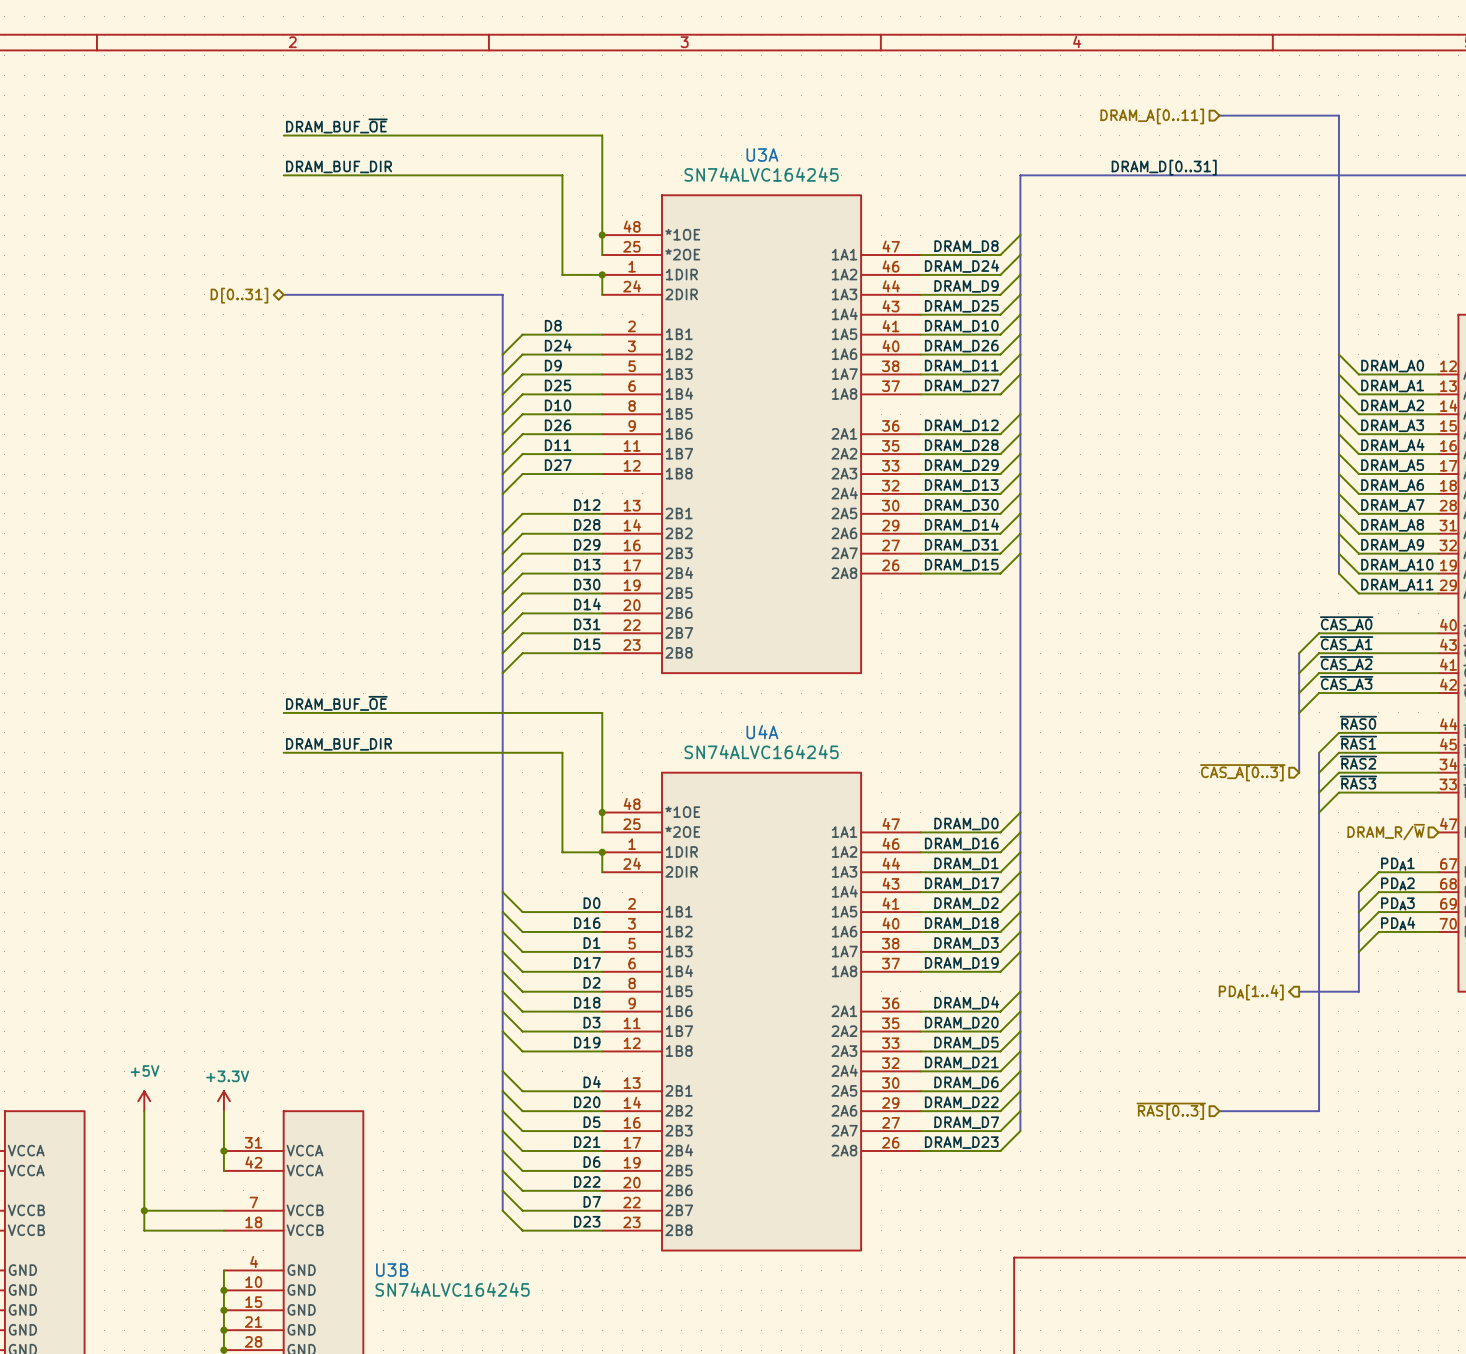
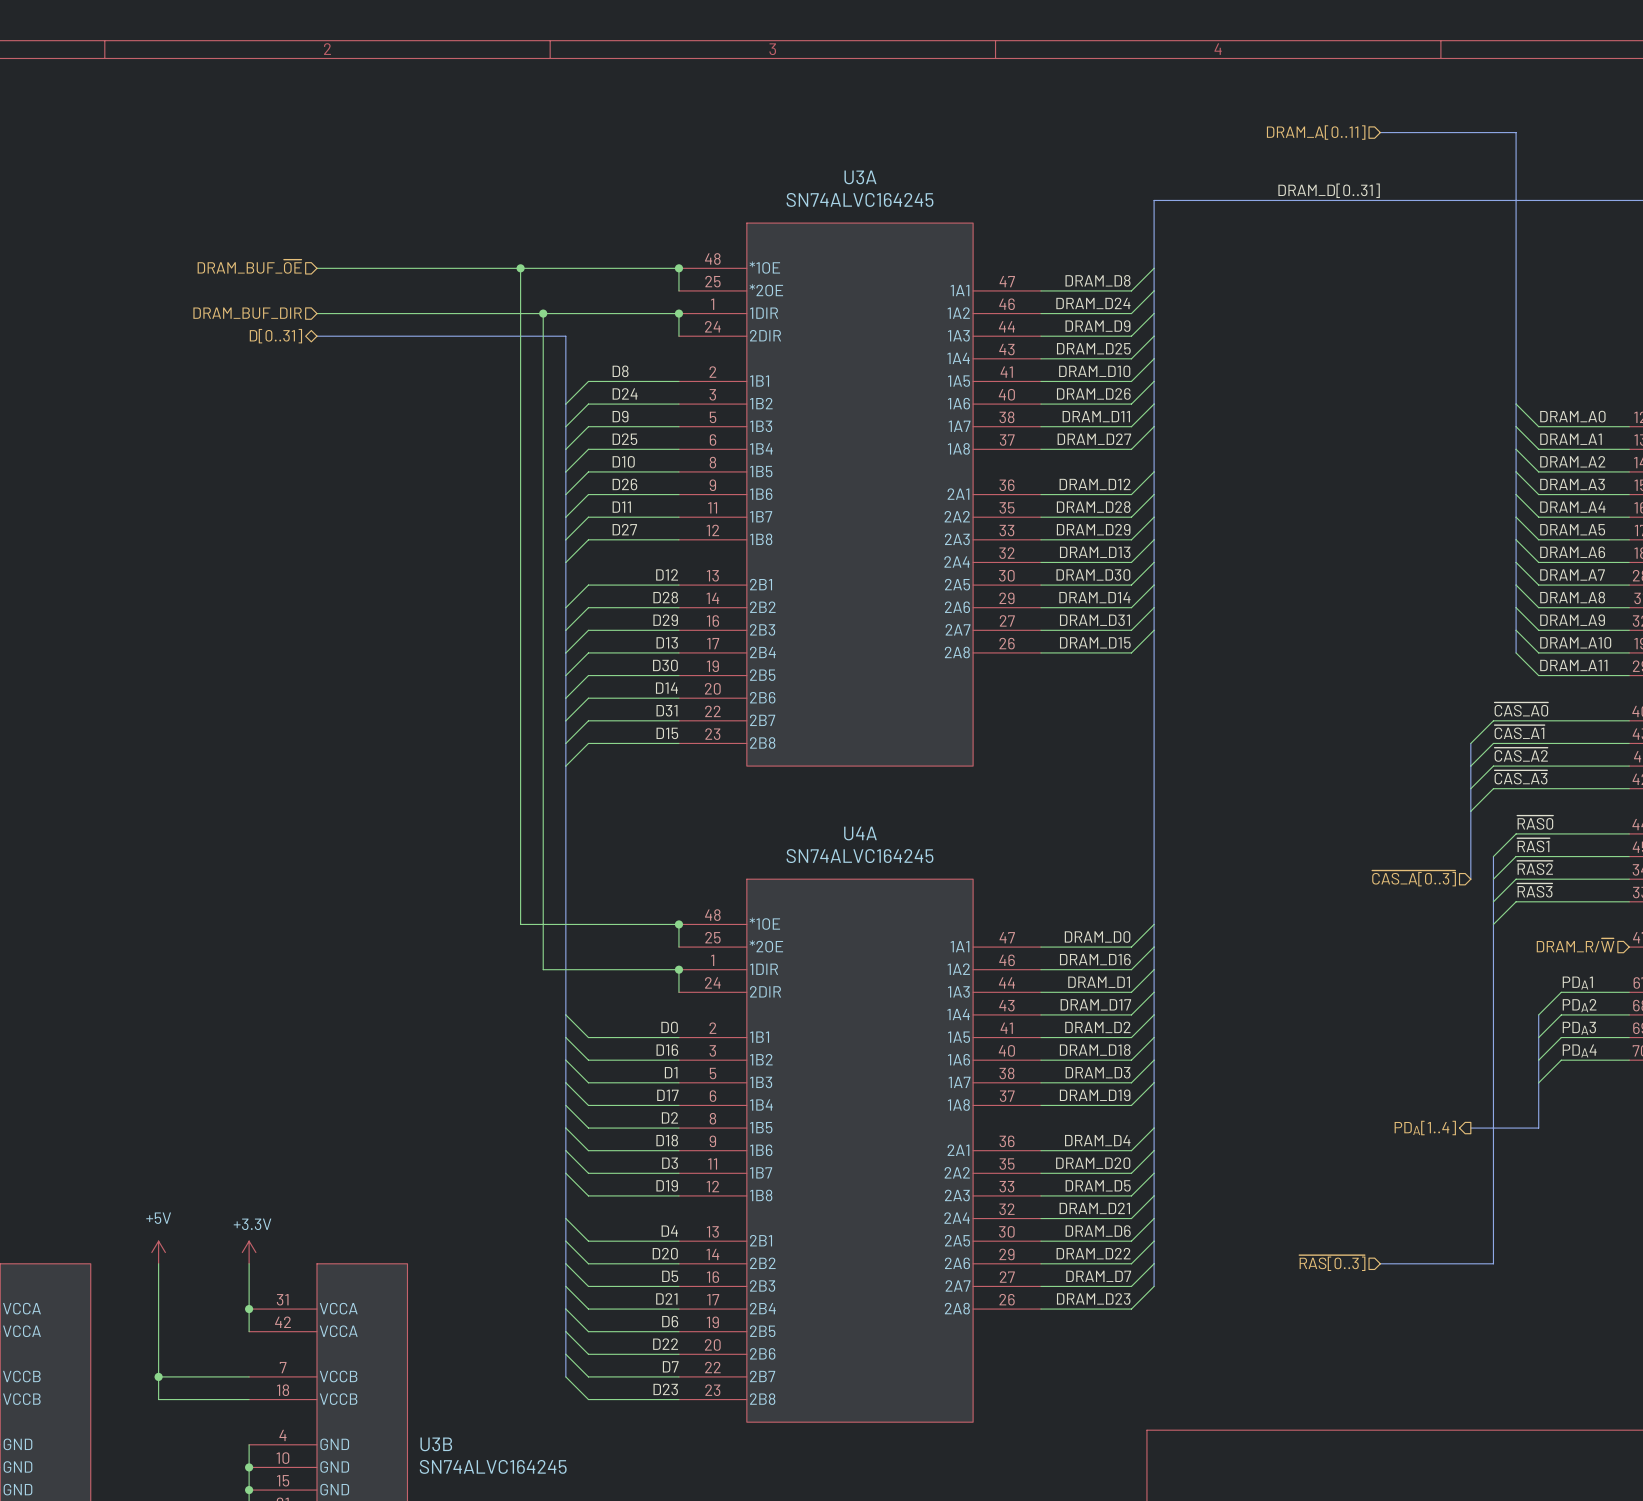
label: DRAM_BUF_~{OE} (336, 125) -> none
wire: (283, 135) (602, 135) (602, 235) -> (316, 268) (678, 268)
label: DRAM_BUF_DIR (338, 166) -> none
wire: (283, 175) (562, 175) (562, 274) -> (316, 313) (633, 313)
hierarchical label: none -> DRAM_BUF_~{OE} (249, 266)
junction: none -> (520, 268)
junction: none -> (543, 313)
hierarchical label: none -> DRAM_BUF_DIR (247, 313)
label: DRAM_BUF_~{OE} (336, 703) -> none
wire: (283, 712) (602, 712) (602, 812) -> (520, 268) (520, 924) (678, 924)
label: DRAM_BUF_DIR (338, 744) -> none
wire: (283, 752) (562, 752) (562, 852) -> (543, 313) (543, 969) (633, 969)

